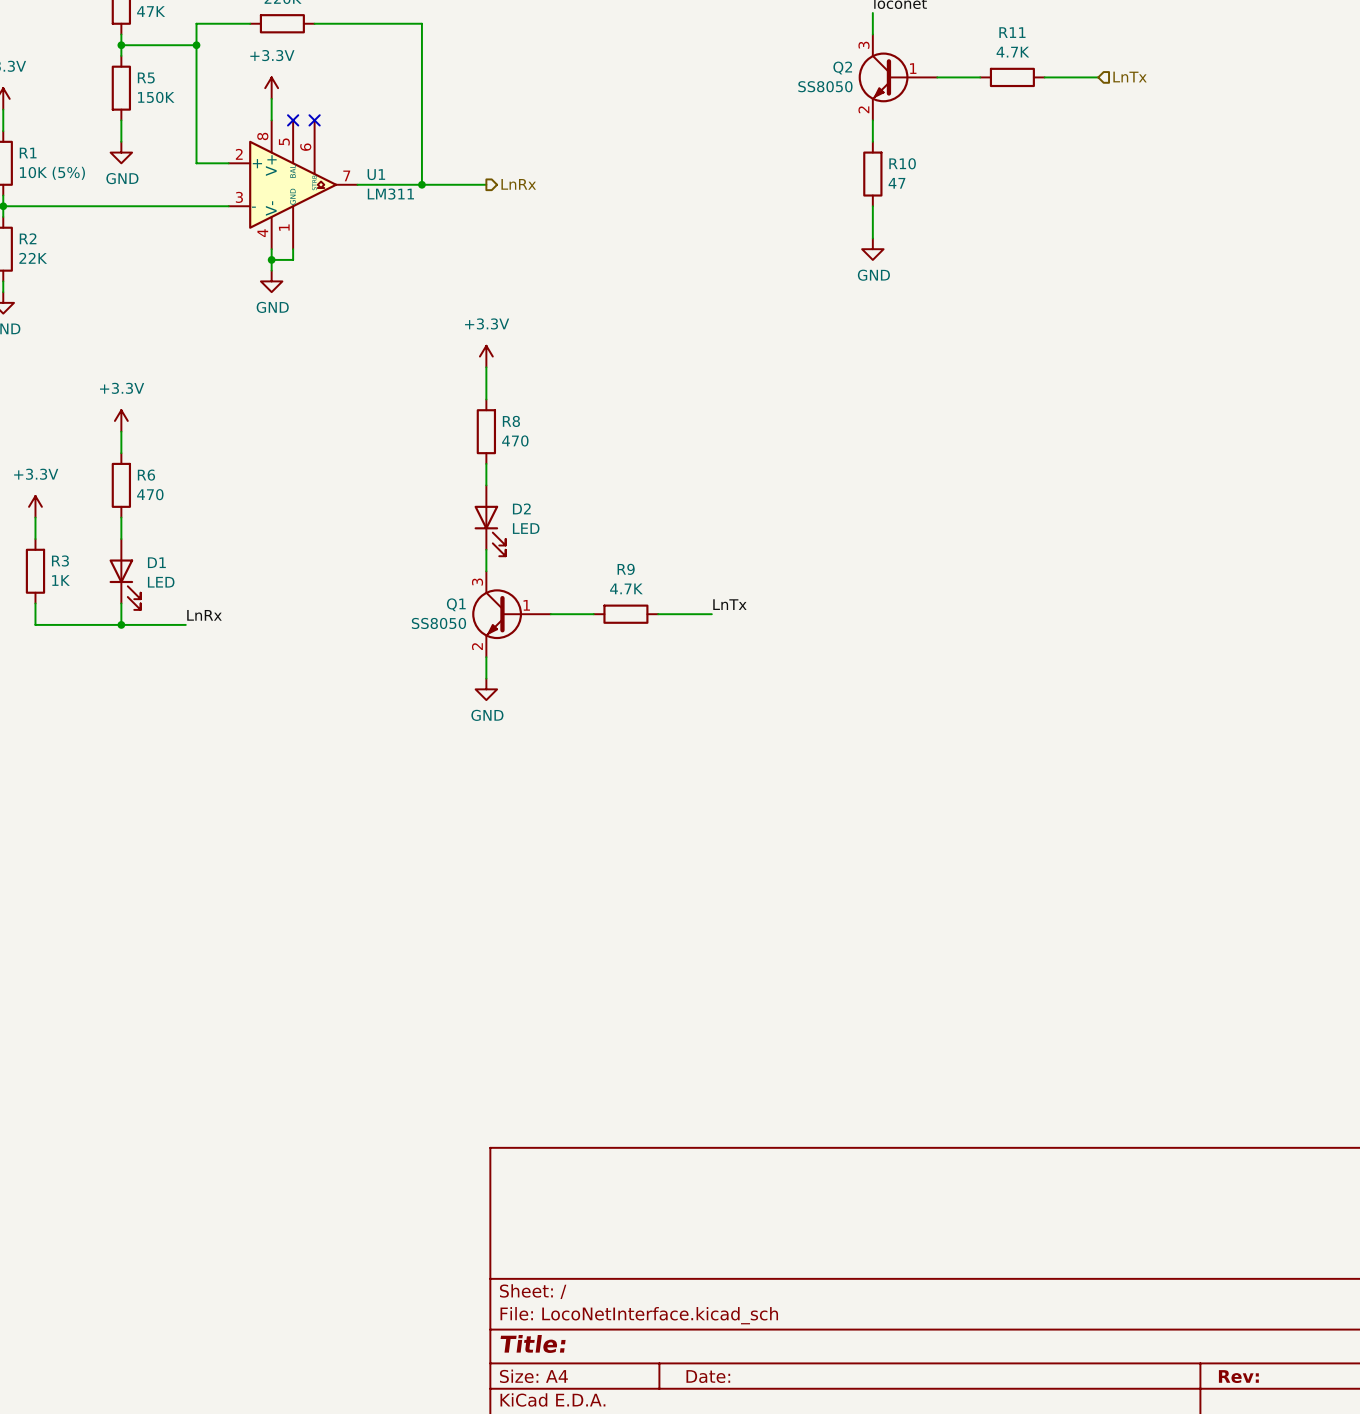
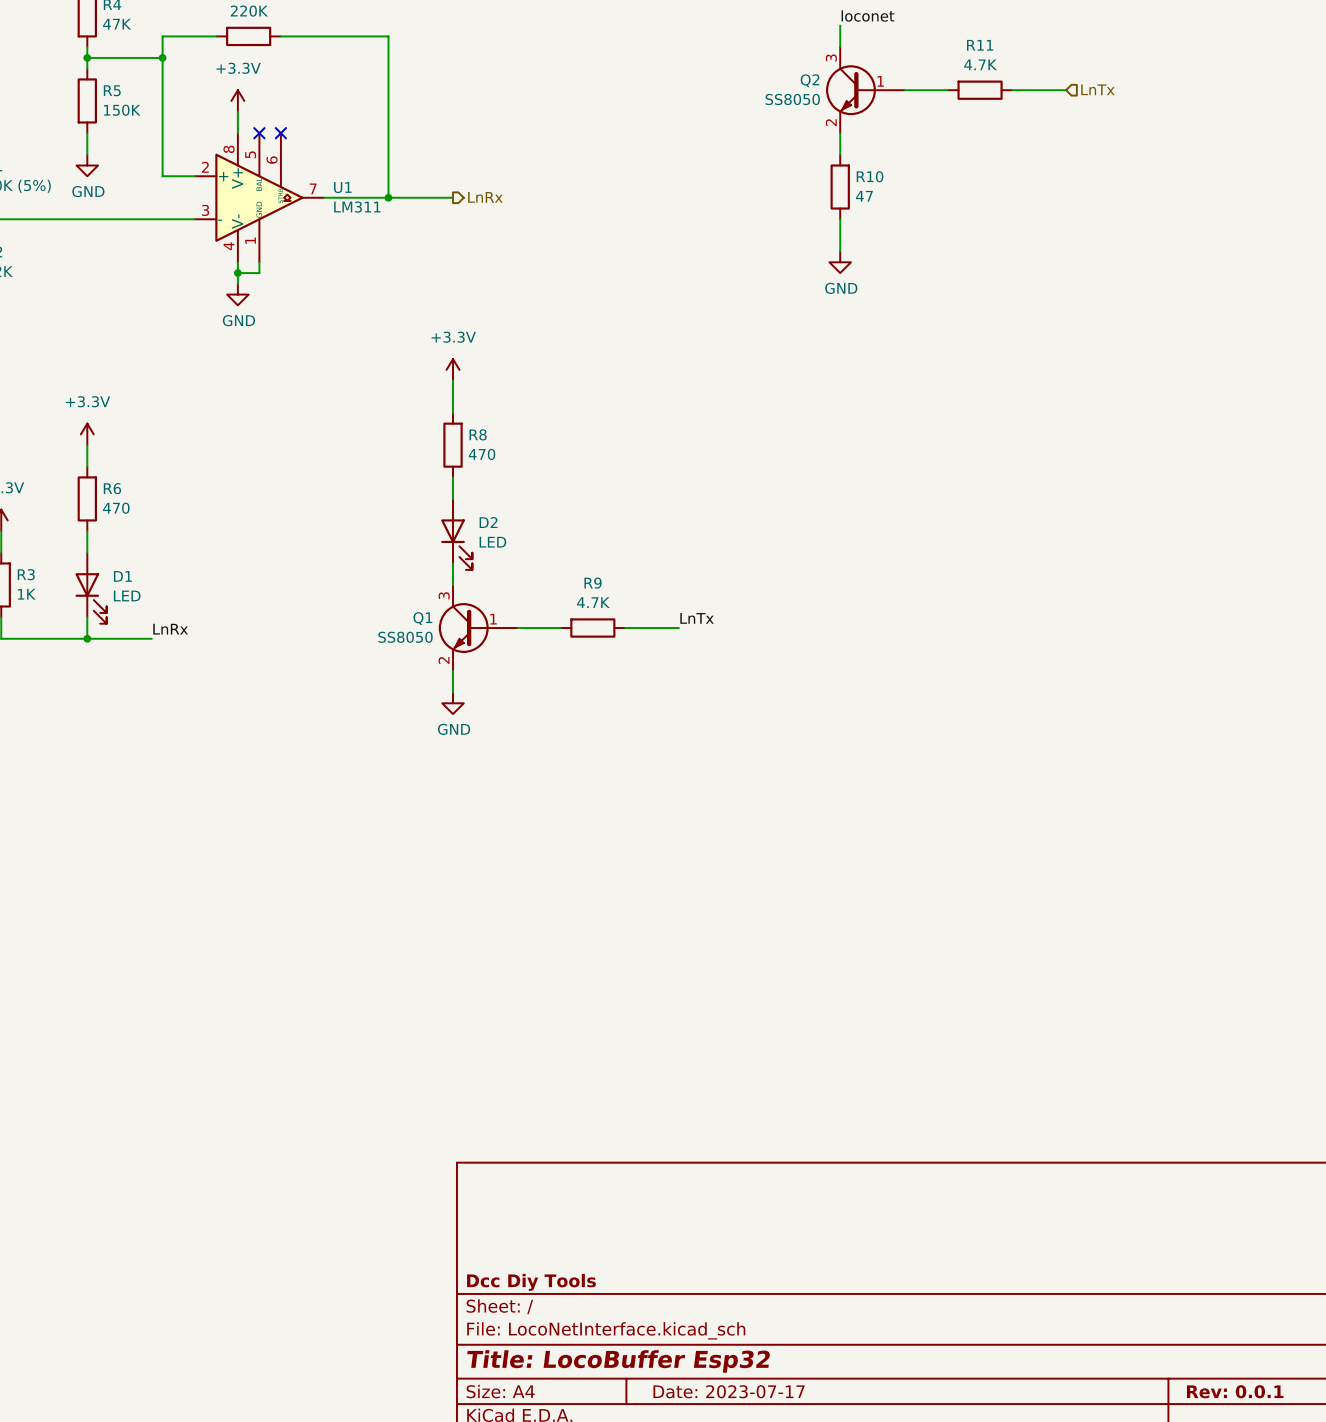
title block: none -> Dcc Diy Tools (531, 1282)
title block: Title: (533, 1343) -> Title: LocoBuffer Esp32 (618, 1361)
title block: Date: (708, 1376) -> Date: 2023-07-17 (729, 1391)
title block: Rev: (1238, 1376) -> Rev: 0.0.1 (1235, 1391)

